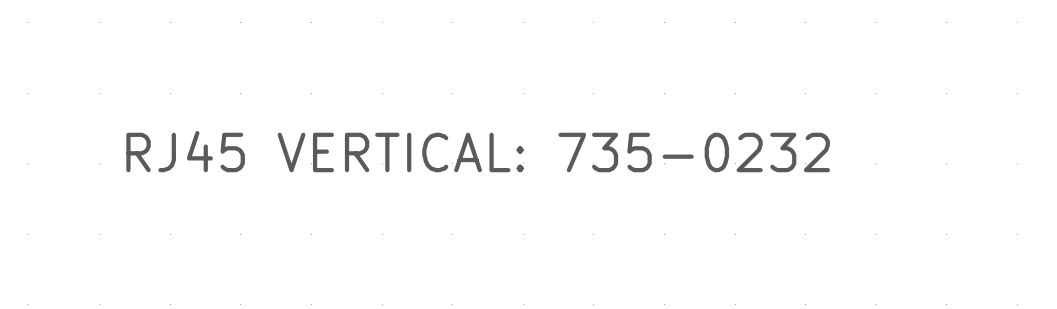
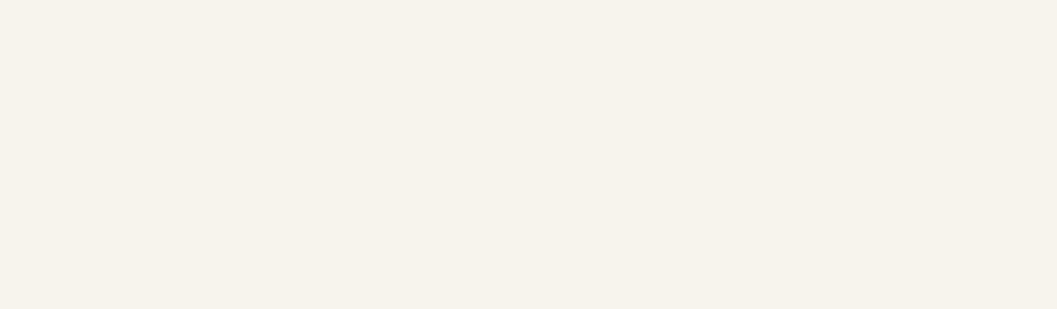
text: RJ45 VERTICAL: 735-0232 (478, 151) -> none

